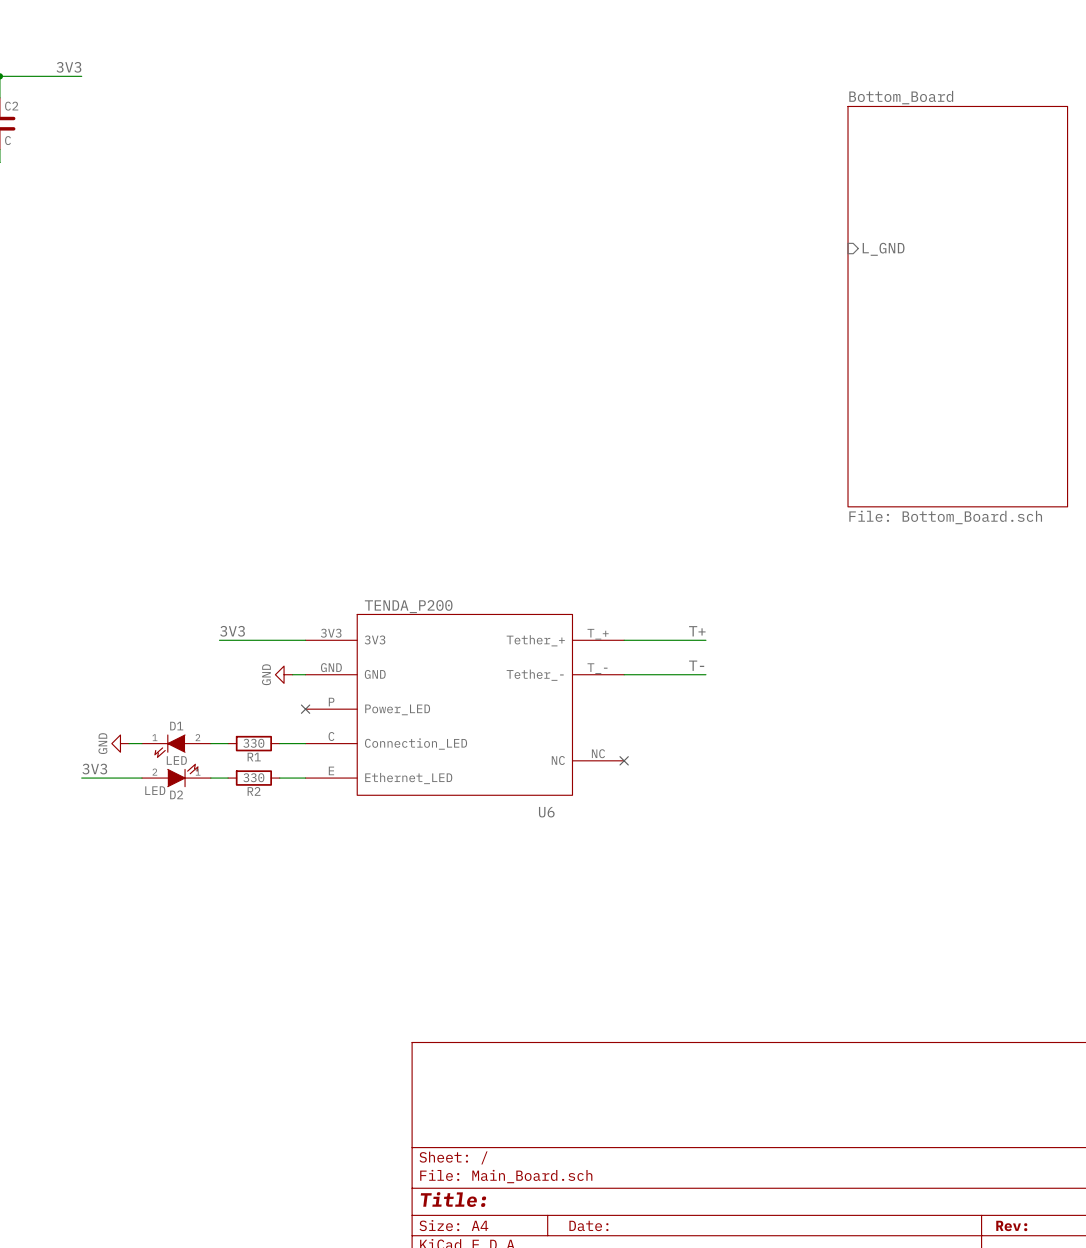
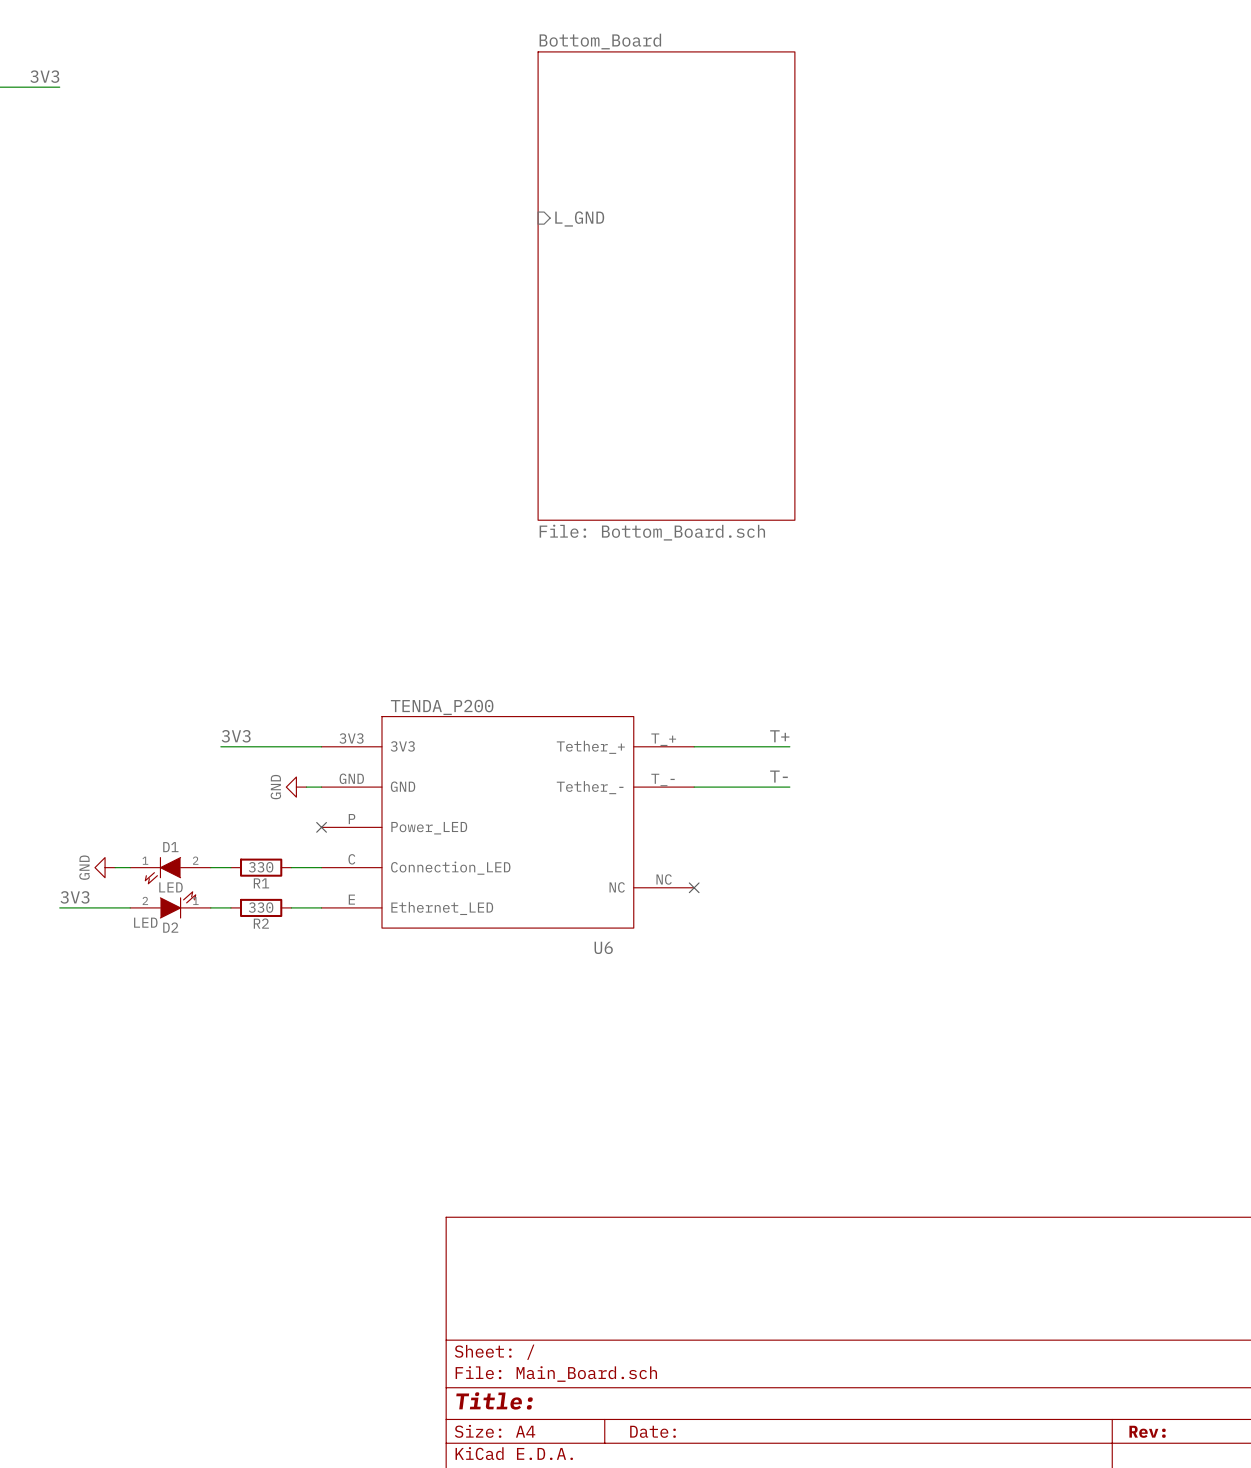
sheet pin: none -> L_GND (579, 219)
sheet Bottom_Board: none -> File: Bottom_Board.sch (666, 286)
sheet pin: L_GND (883, 249) -> none
sheet Bottom_Board: File: Bottom_Board.sch (957, 306) -> none

